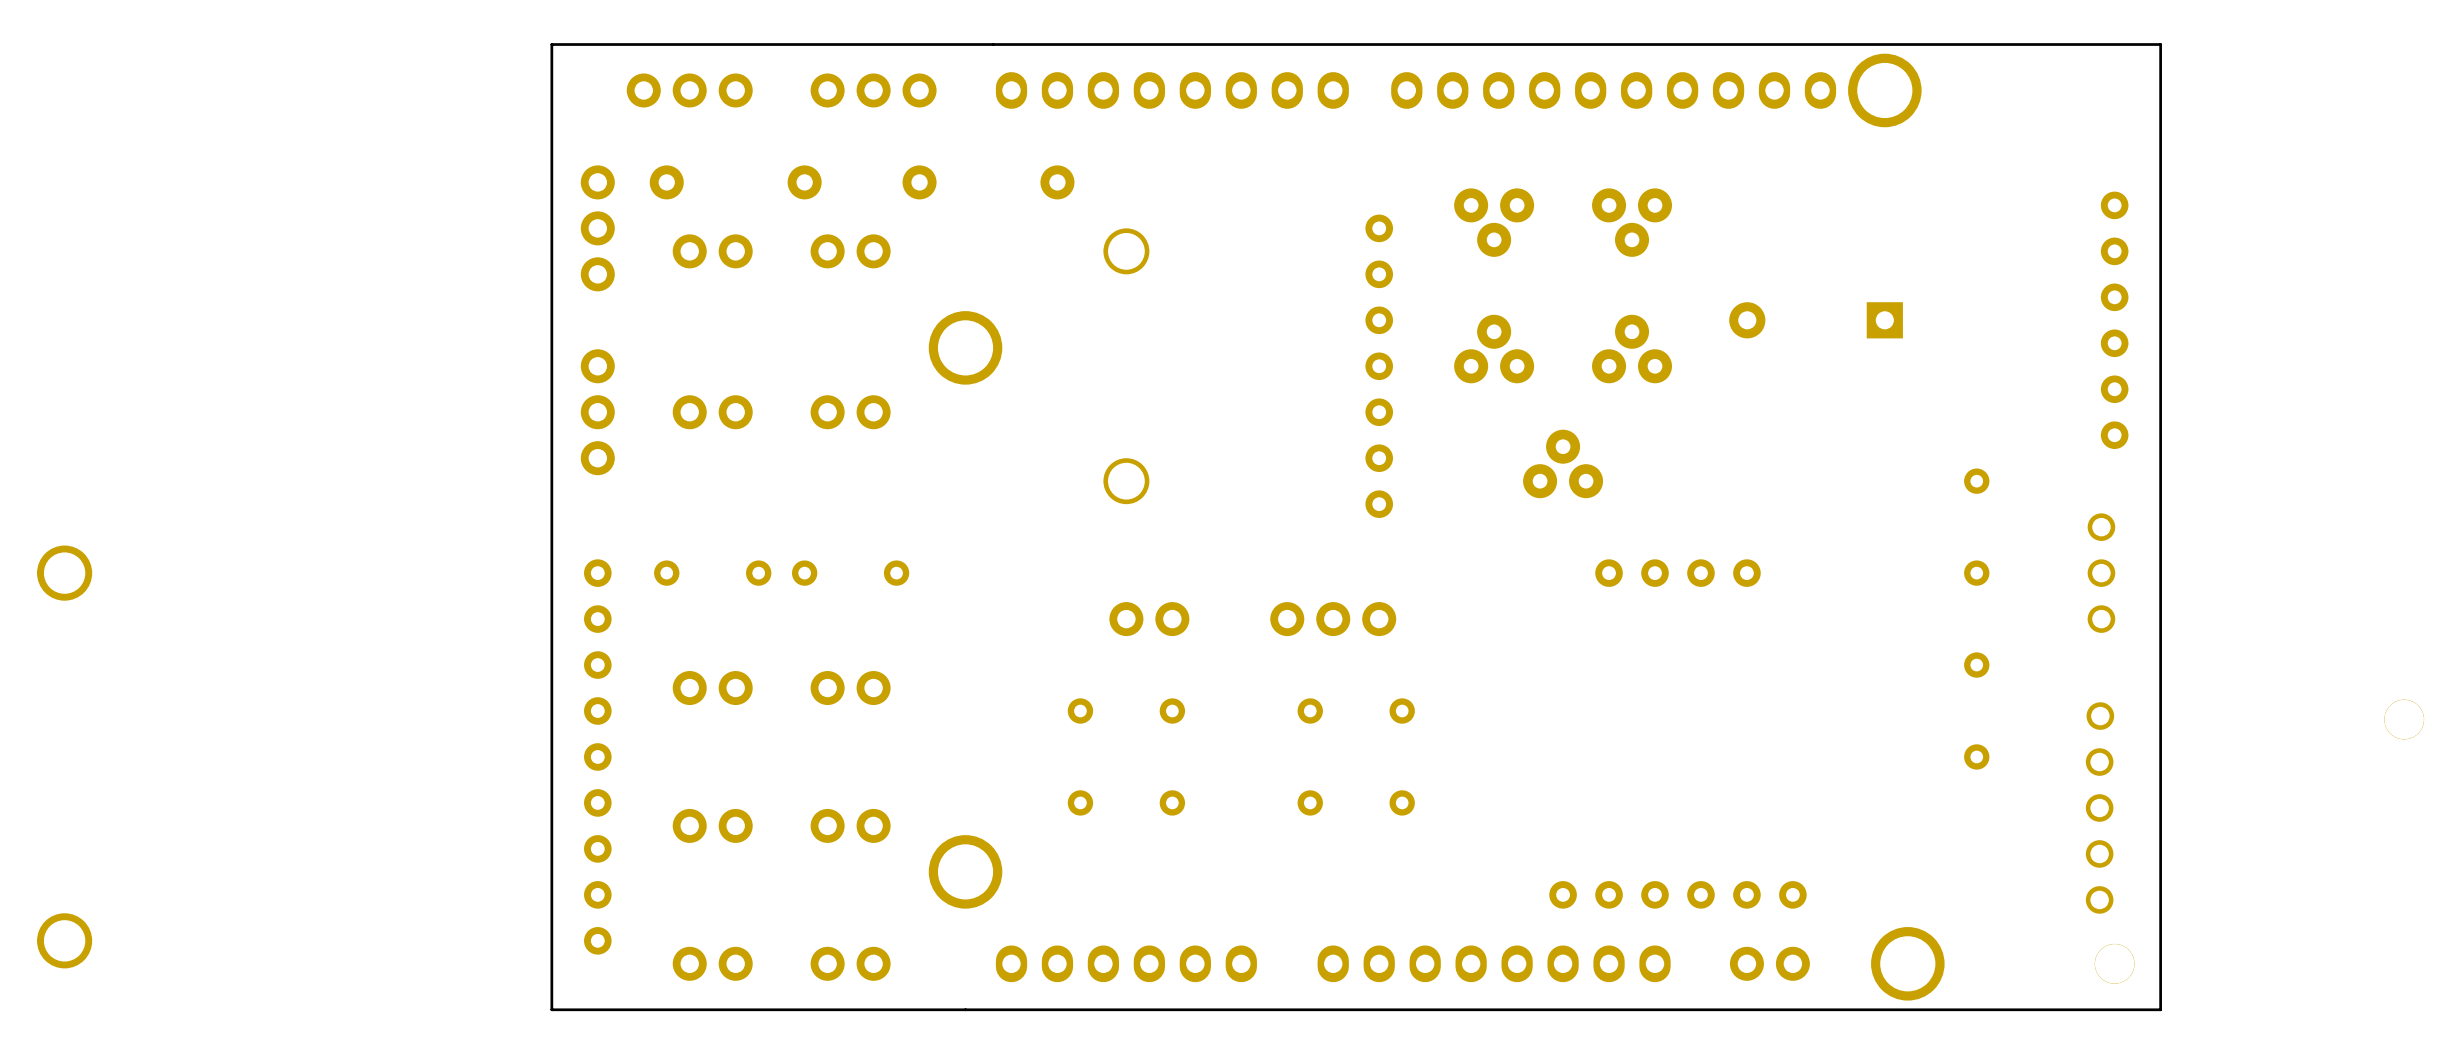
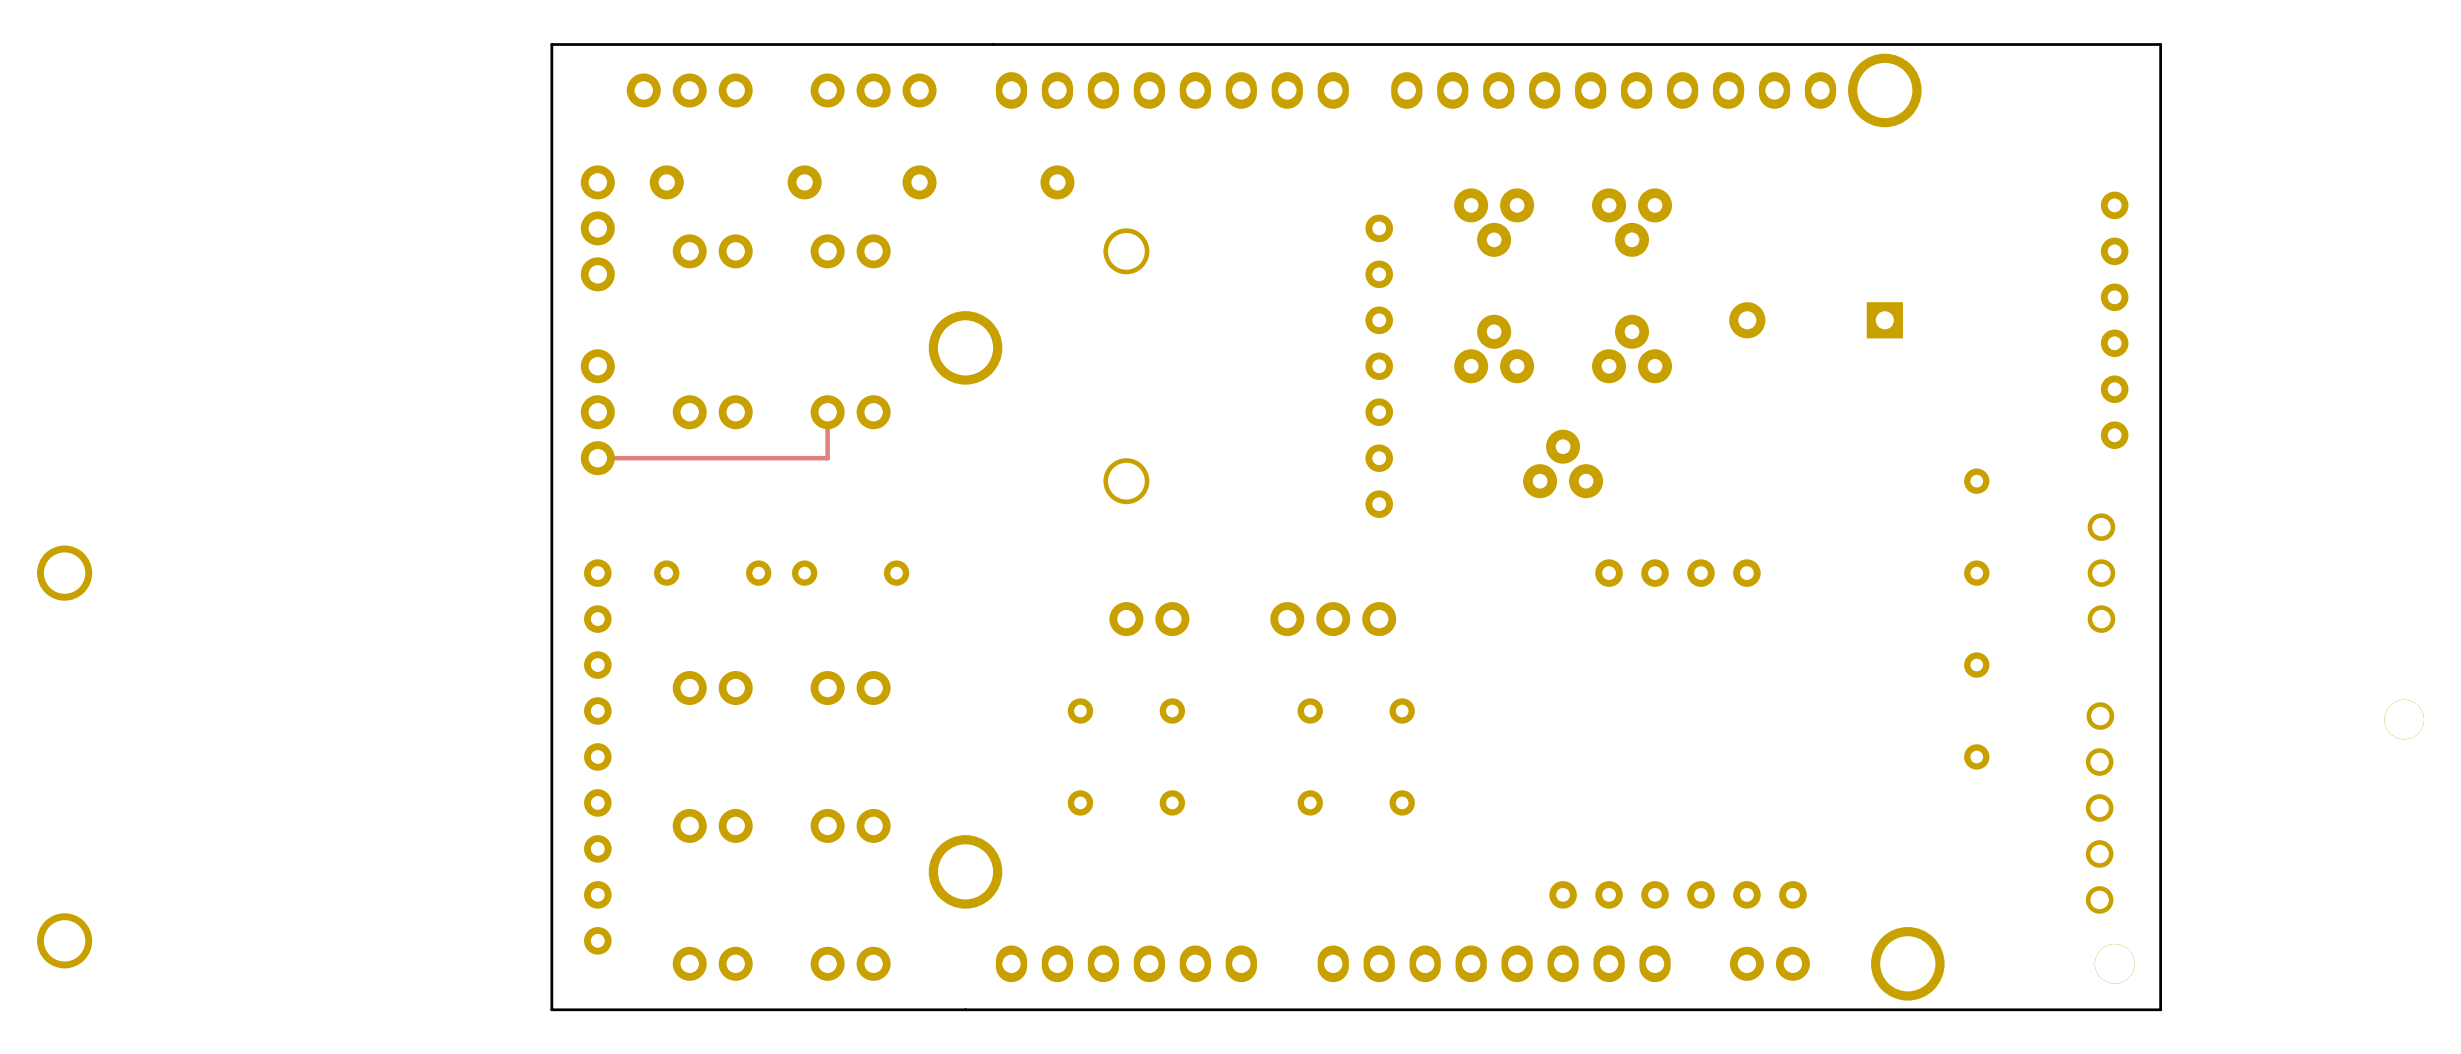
top track: none -> (827, 412) (827, 458) (597, 458)

